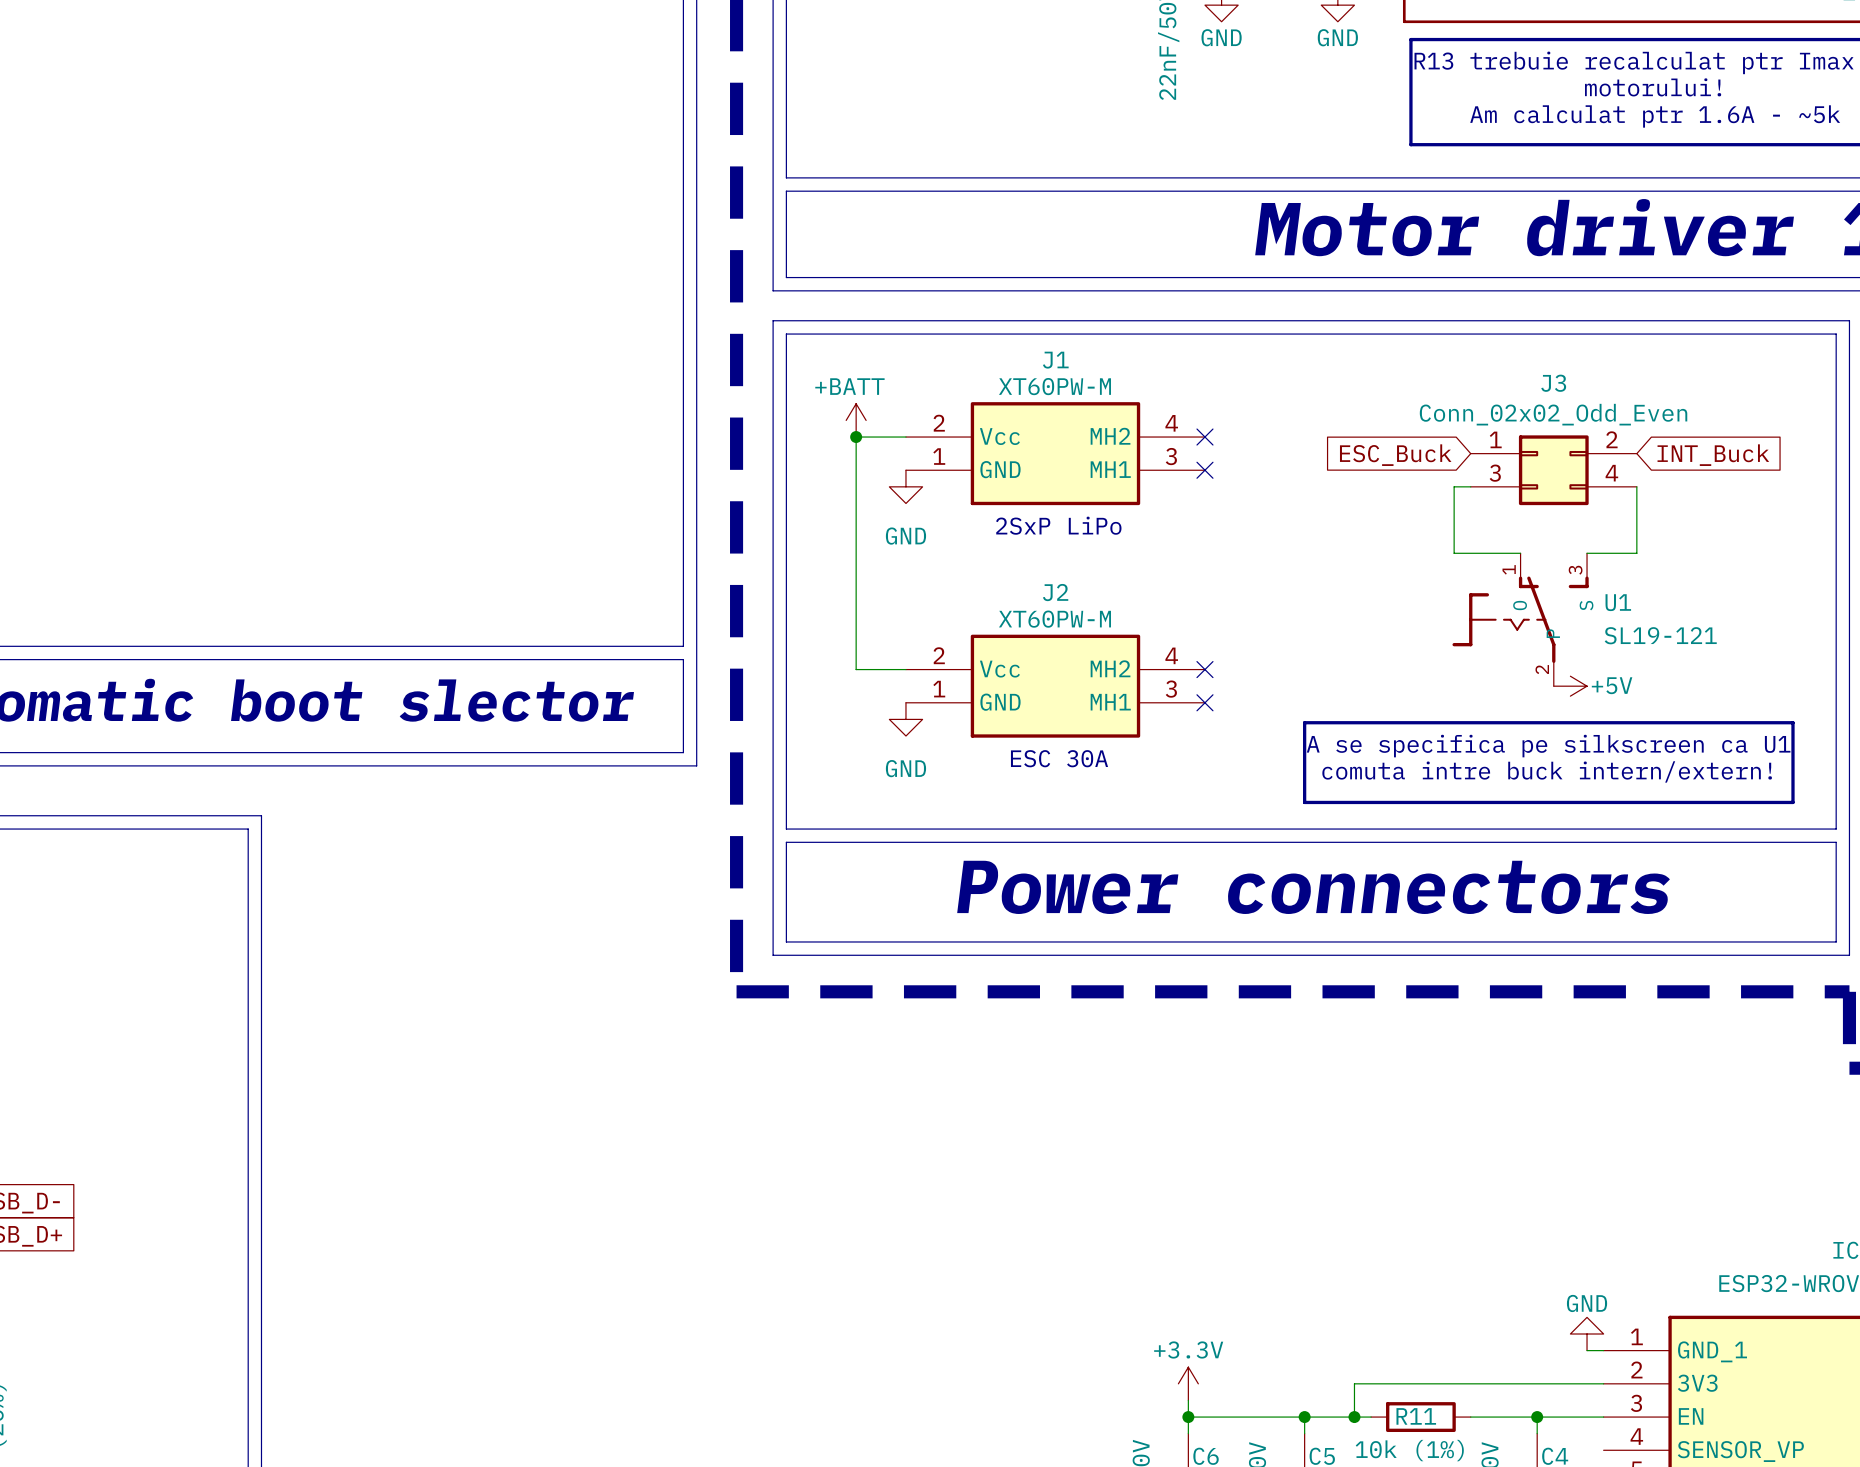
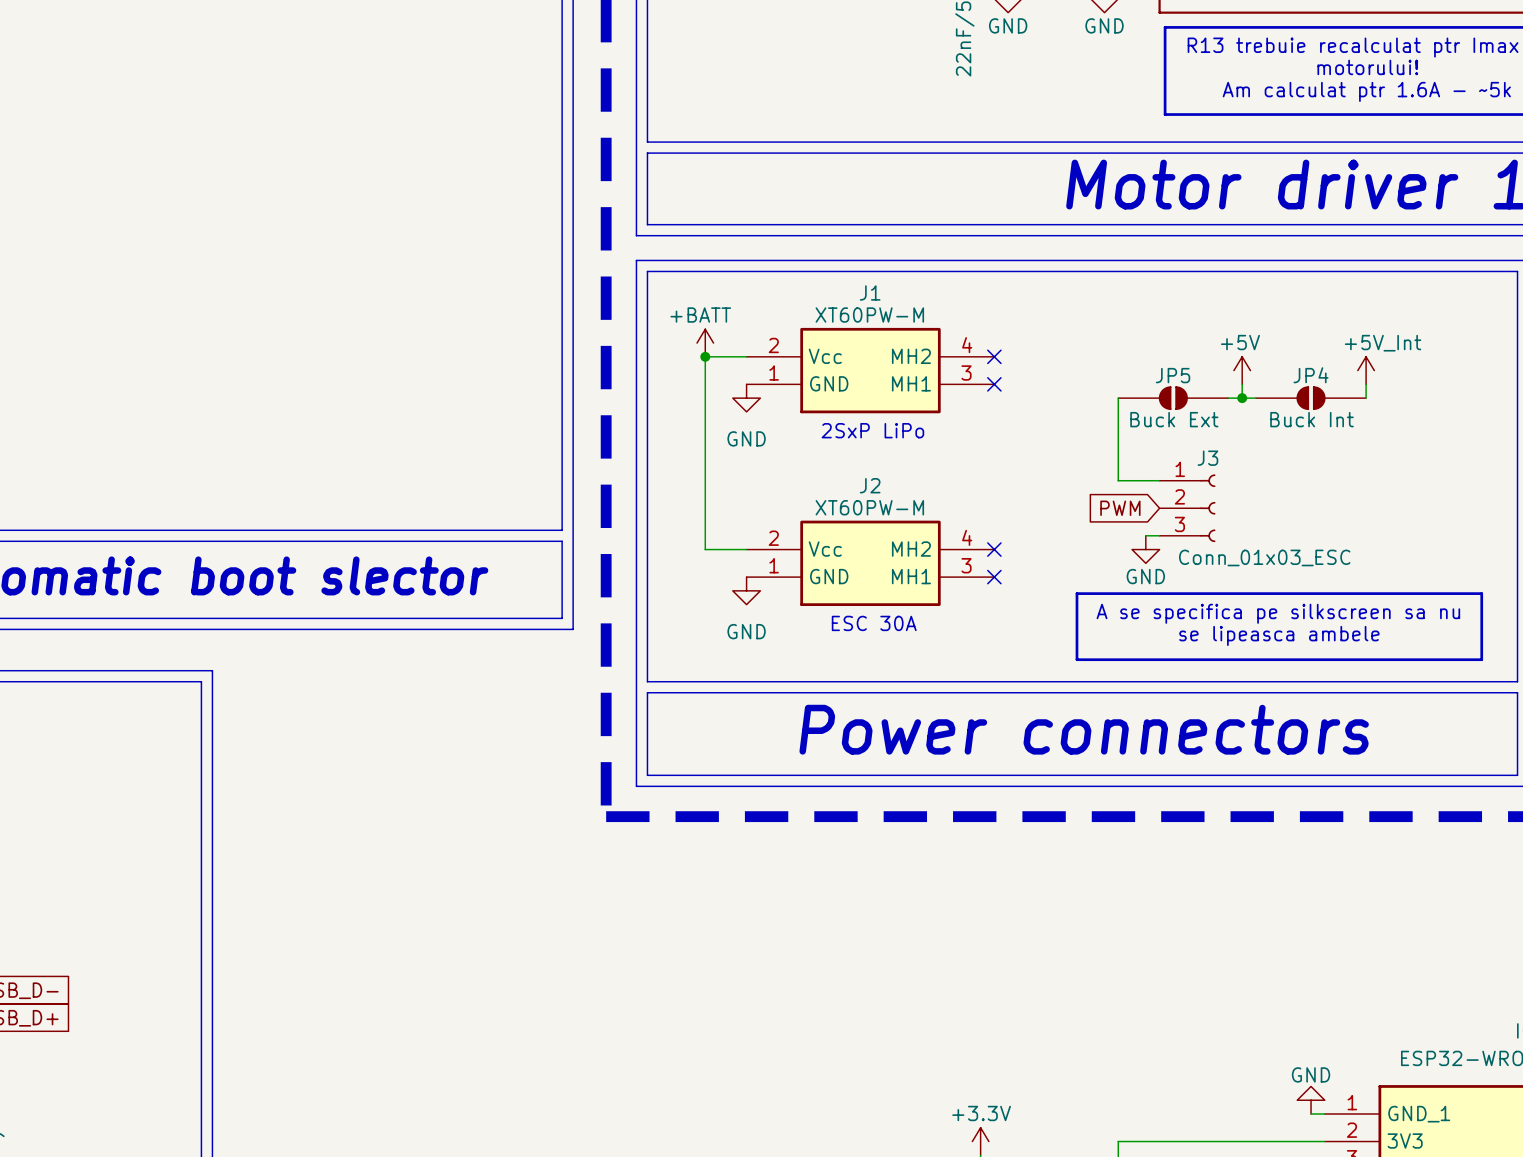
J3 name position: J3 (1553, 383) -> J3 (1207, 458)
J3 value: Conn_02x02_Odd_Even (1553, 414) -> Conn_01x03_ESC (1264, 557)
J3 symbol: [1470, 435, 1637, 506] -> [1159, 474, 1216, 543]
power symbol: none -> +5V_Int (1366, 370)
global label: ESC_Buck (1395, 455) -> none
global label: INT_Buck (1713, 455) -> none
wire: none -> (1242, 384) (1242, 398)
wire: none -> (1366, 384) (1366, 398)
wire: none -> (1118, 398) (1118, 480) (1159, 480)
JP5: none -> Buck Ext (1173, 398)
wire: (1470, 486) (1454, 486) (1454, 553) (1520, 553) -> none
junction: none -> (1242, 398)
JP4: none -> Buck Int (1311, 398)
wire: (1636, 486) (1636, 553) (1587, 553) -> none
global label: none -> PWM (1120, 508)
U1: SL19-121 (1520, 619) -> none
wire: none -> (1145, 535) (1159, 535)
power symbol: none -> GND (1145, 549)
power symbol rotation: 0° (1570, 686) -> 90° counterclockwise (1242, 370)
power symbol position: +5V (1570, 686) -> +5V (1242, 370)
text: A se specifica pe silkscreen ca U1 (1548, 746) -> A se specifica pe silkscreen sa nu (1278, 613)
text: comuta intre buck intern/extern! (1547, 771) -> se lipeasca ambele (1279, 635)

